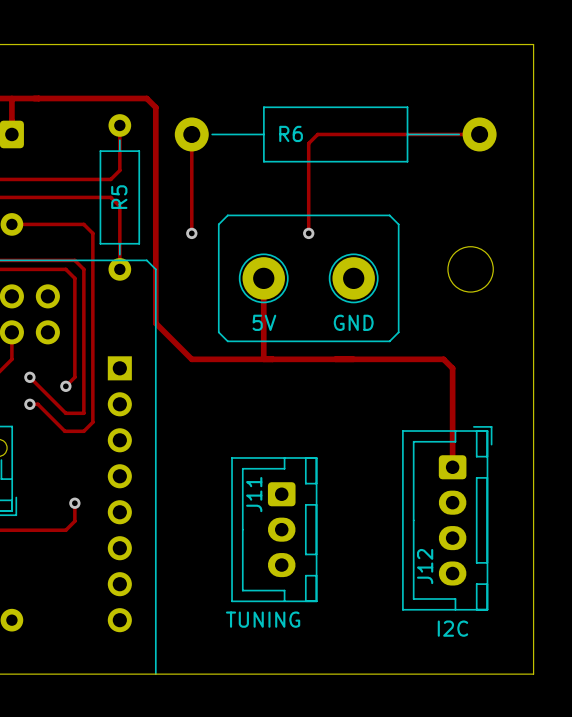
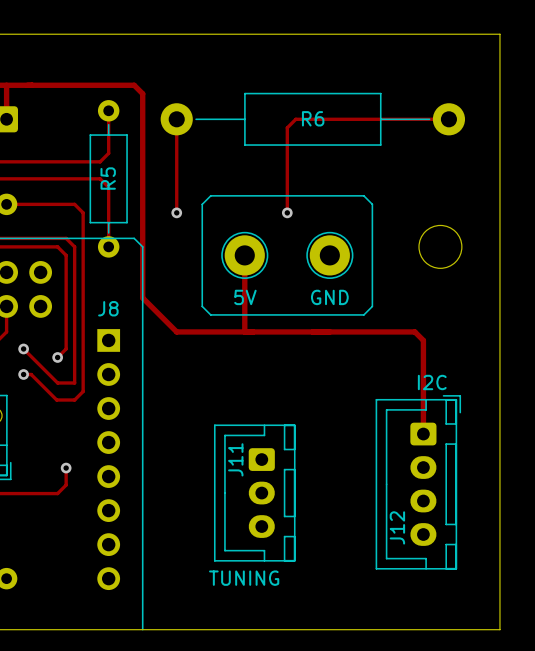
R6 name position: R6 (291, 133) -> R6 (313, 118)
J8 name: none -> J8 (108, 308)
J12 value position: I2C (452, 628) -> I2C (432, 382)

